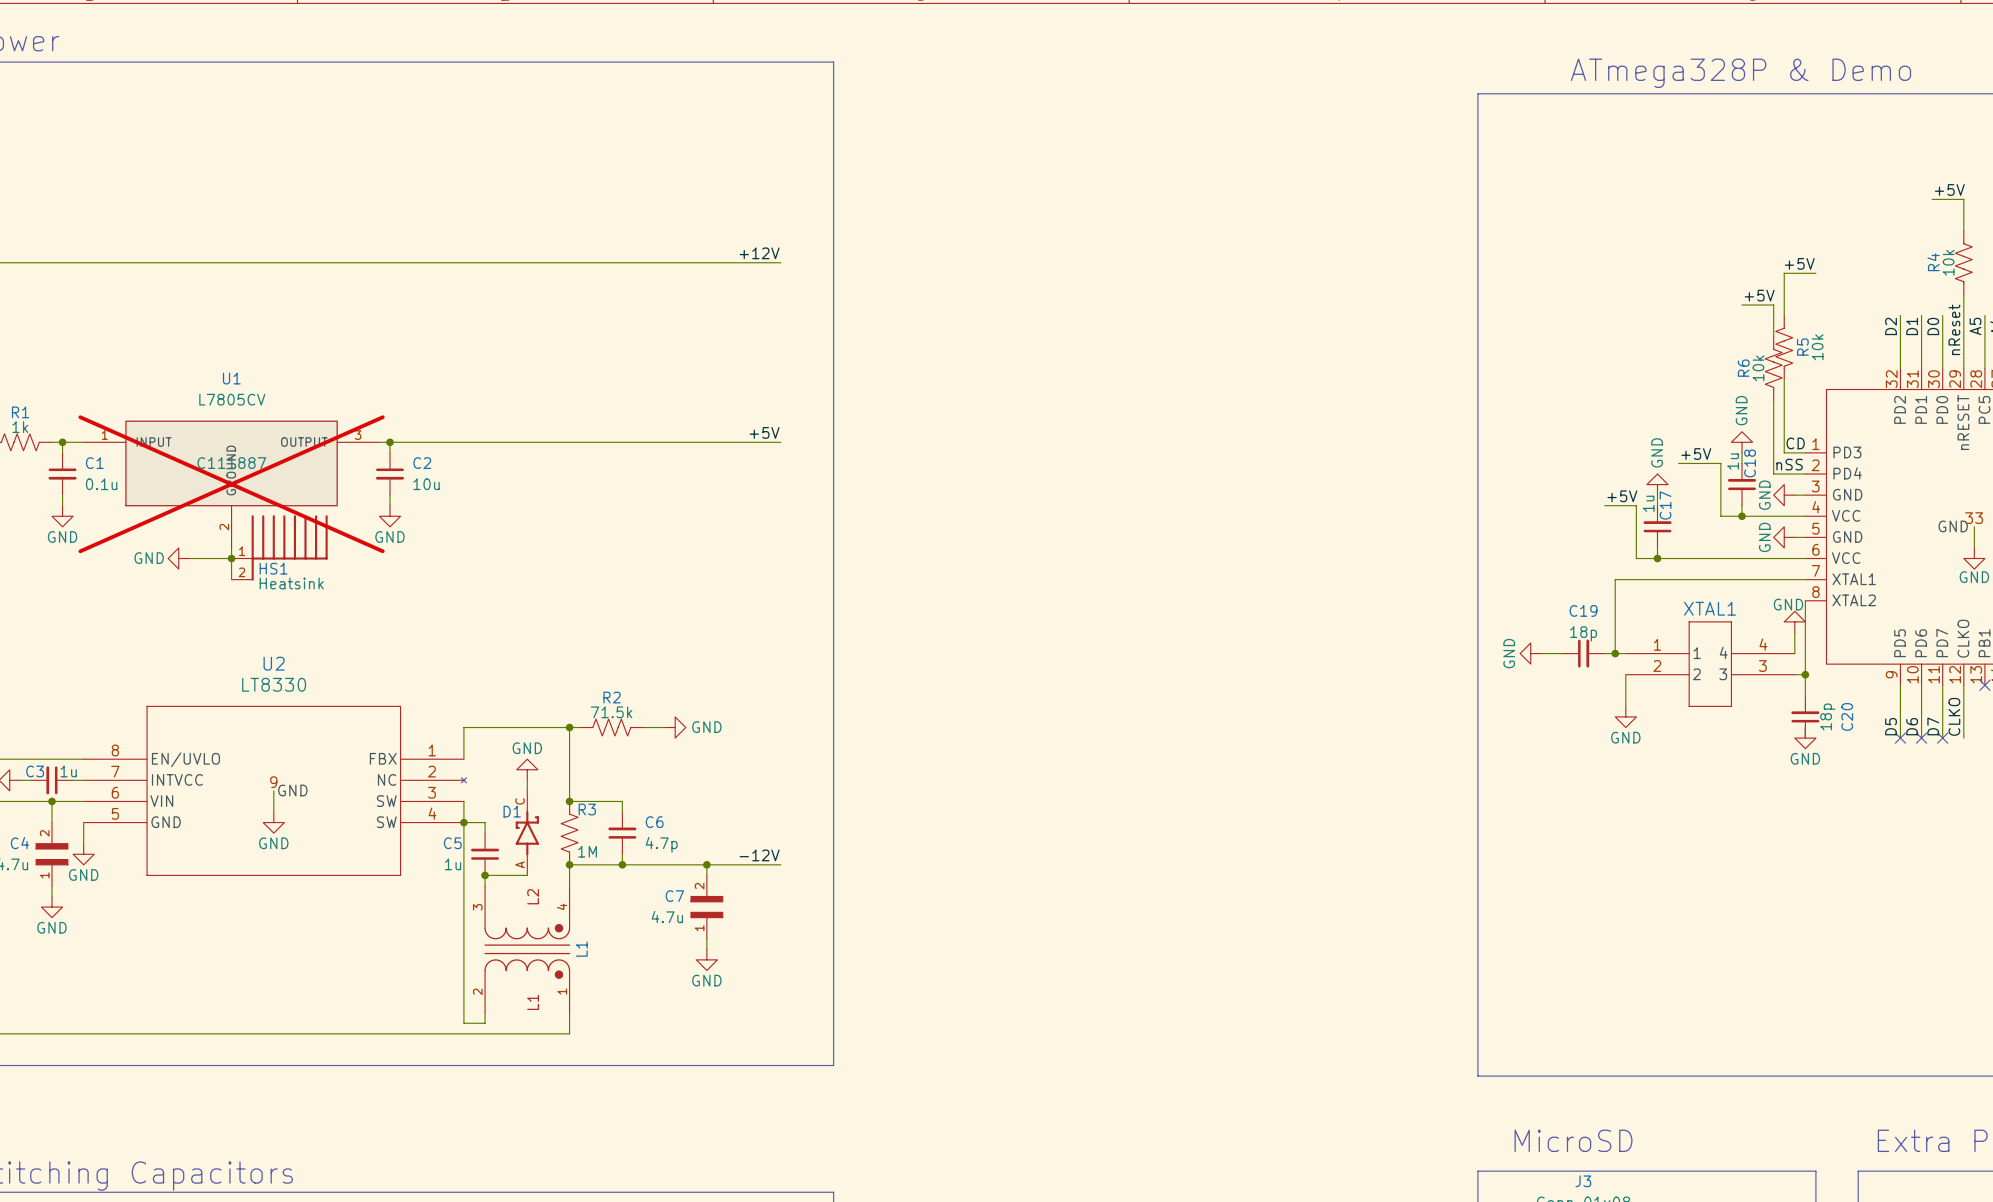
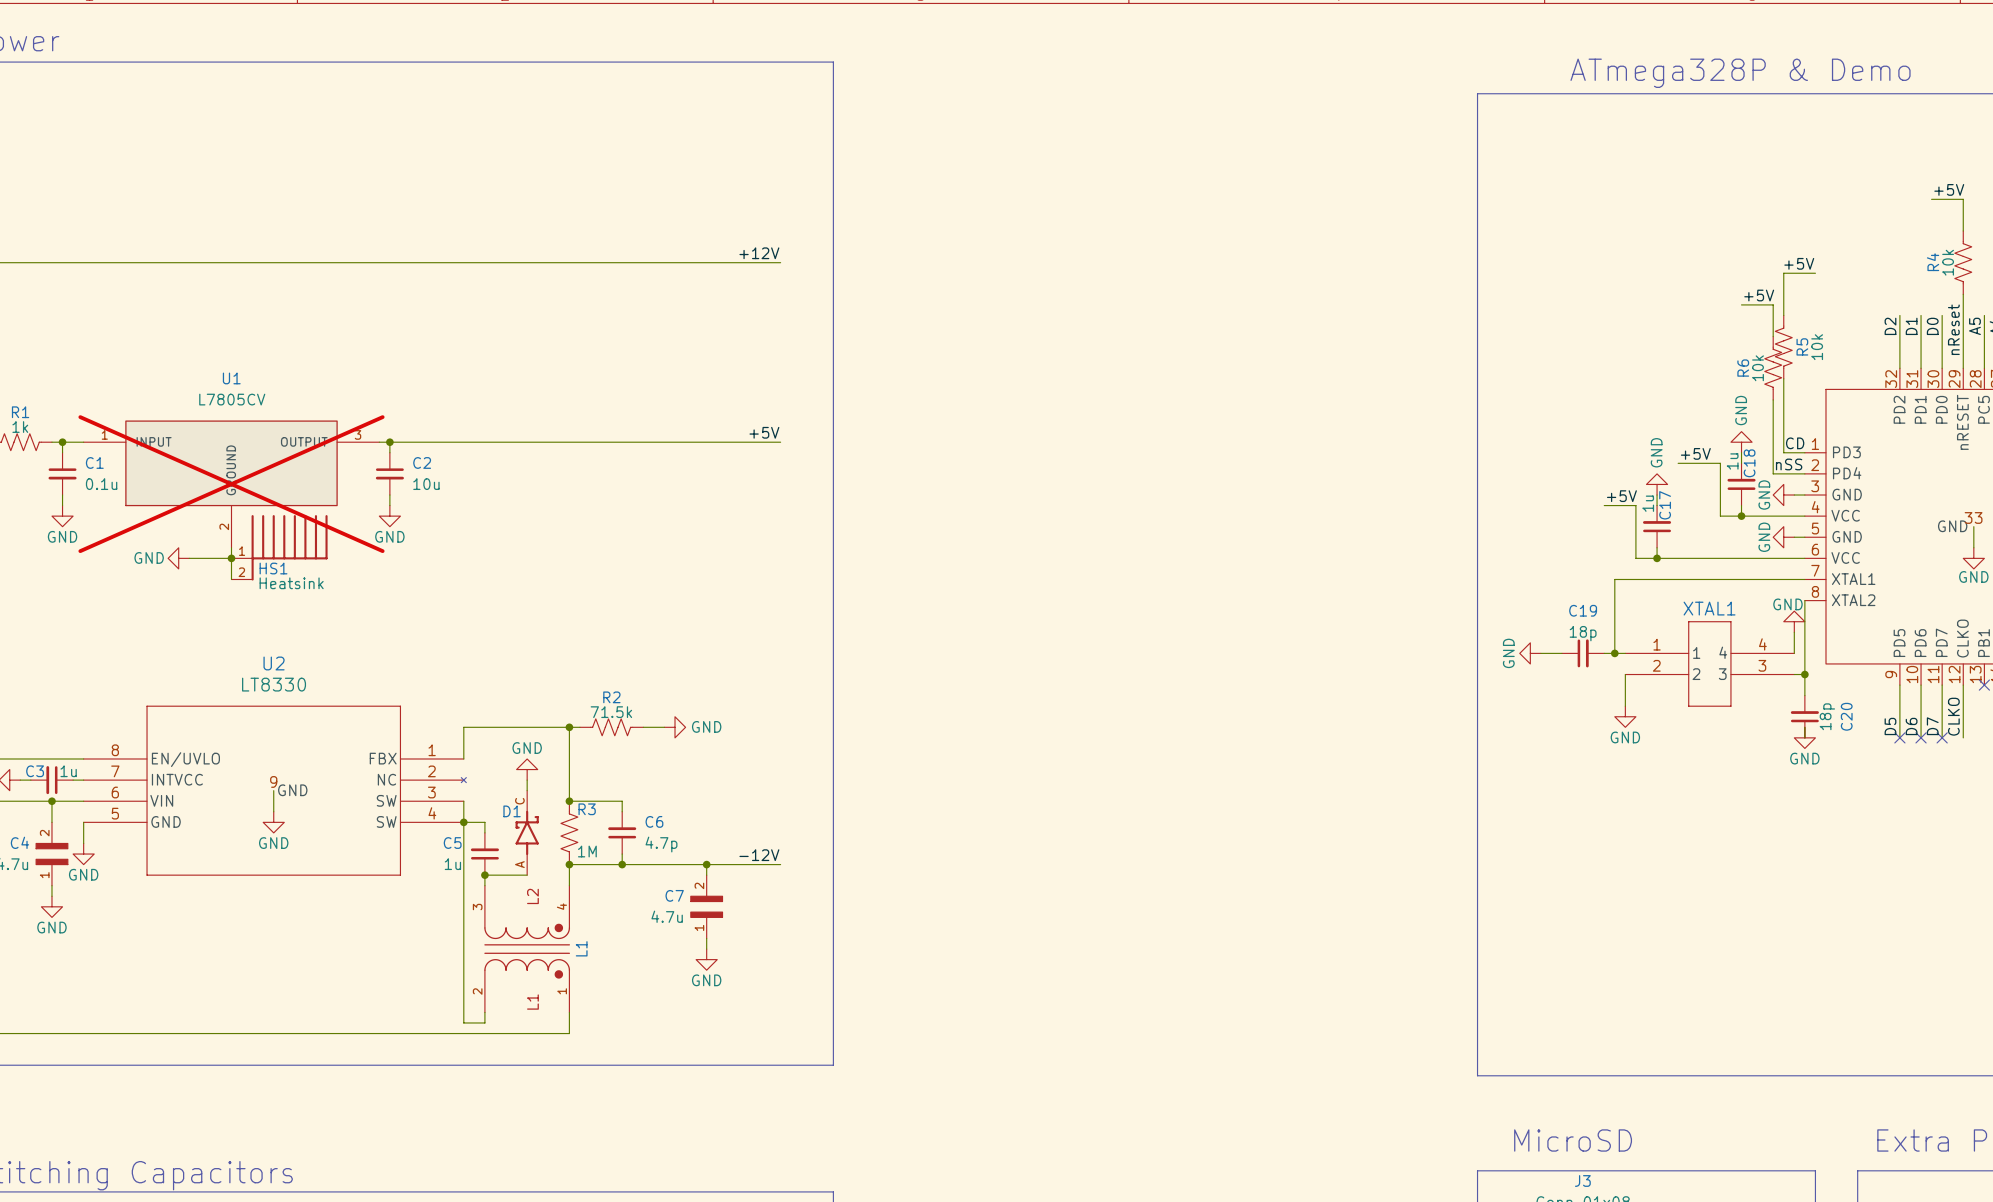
U1 text: C111887 (231, 463) -> none

